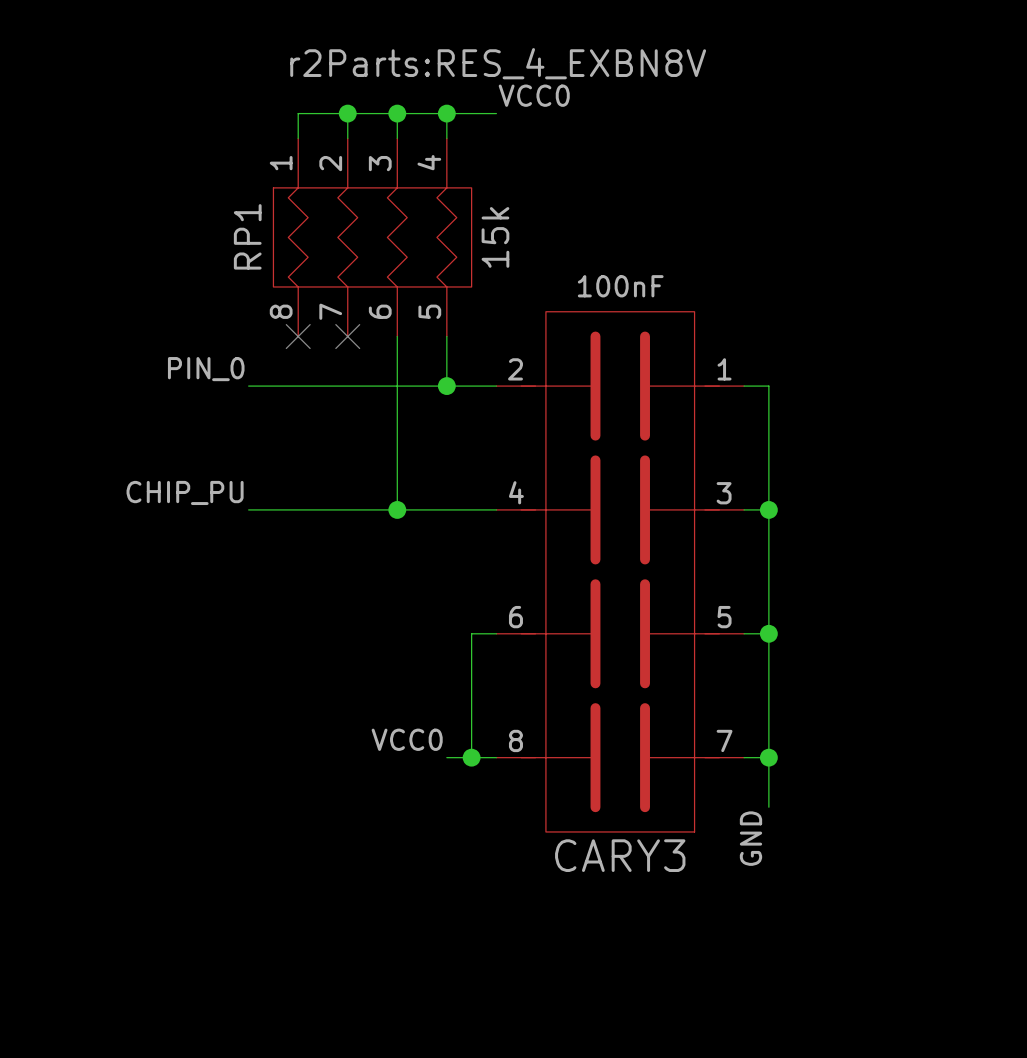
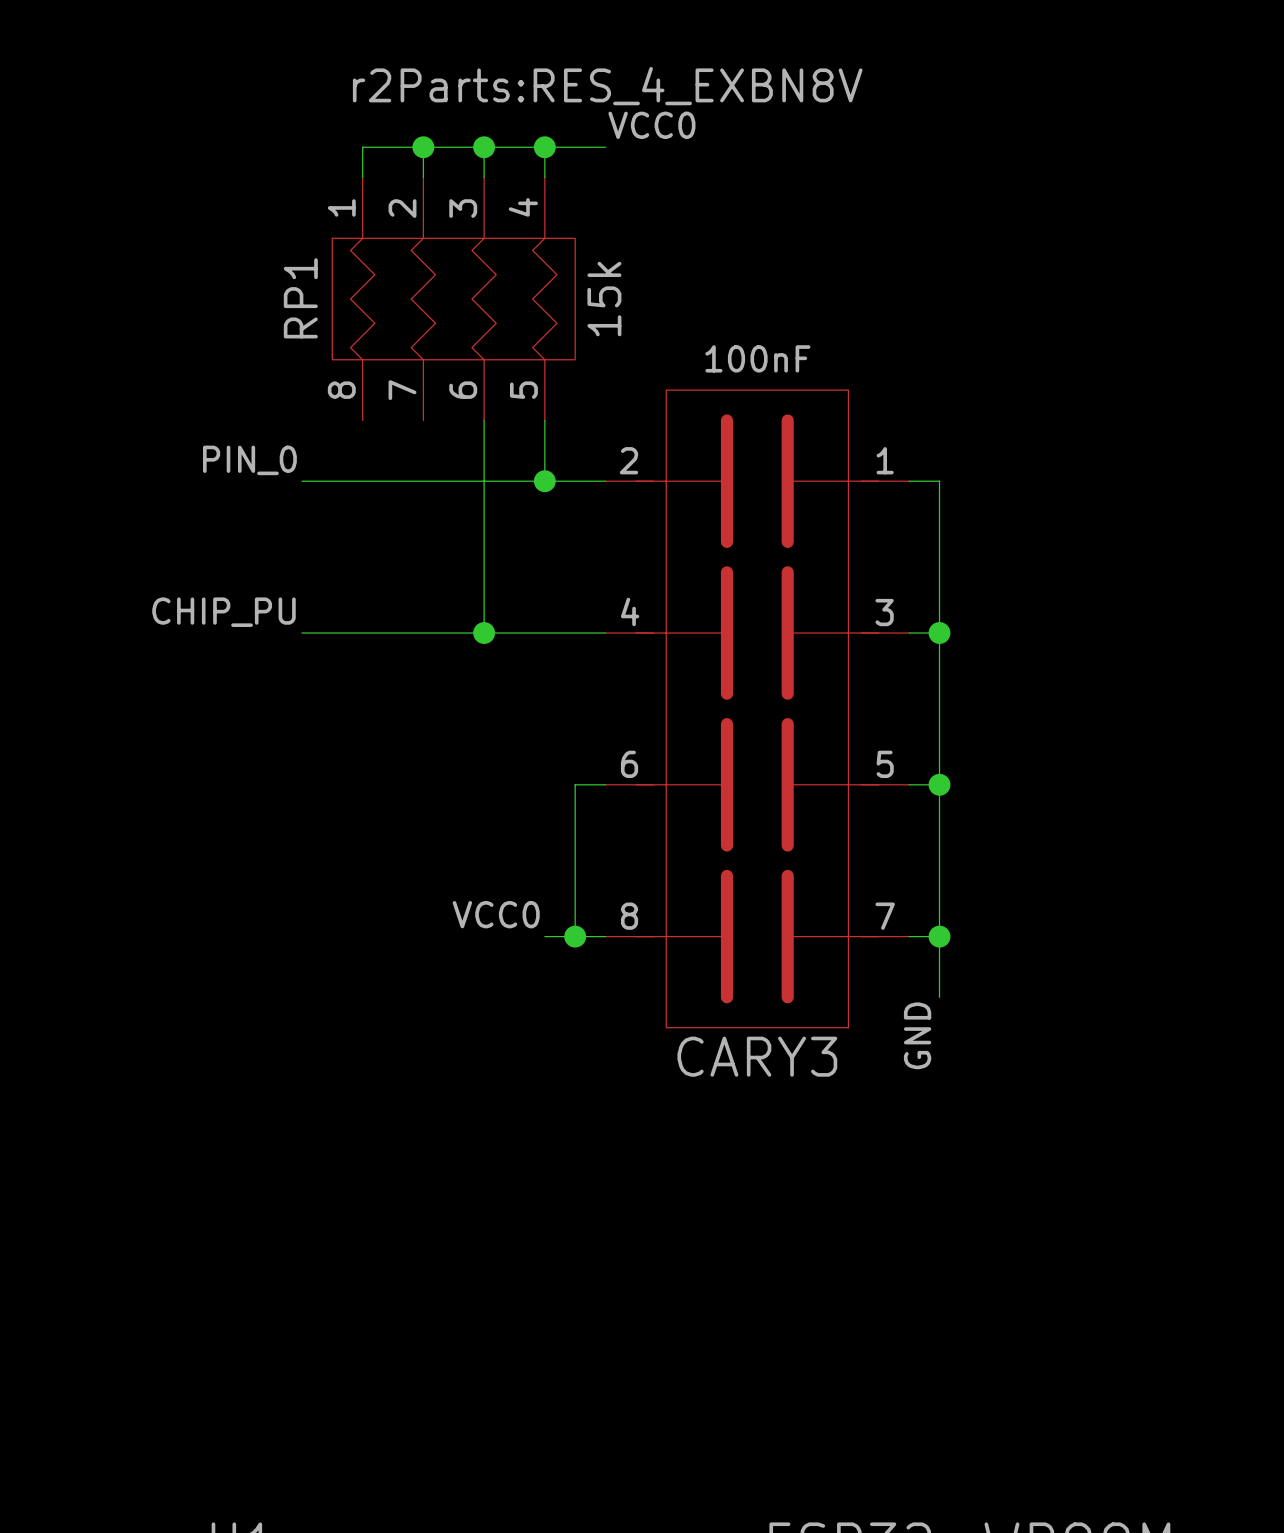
no-connect mark: (298, 336) -> none
no-connect mark: (347, 336) -> none

